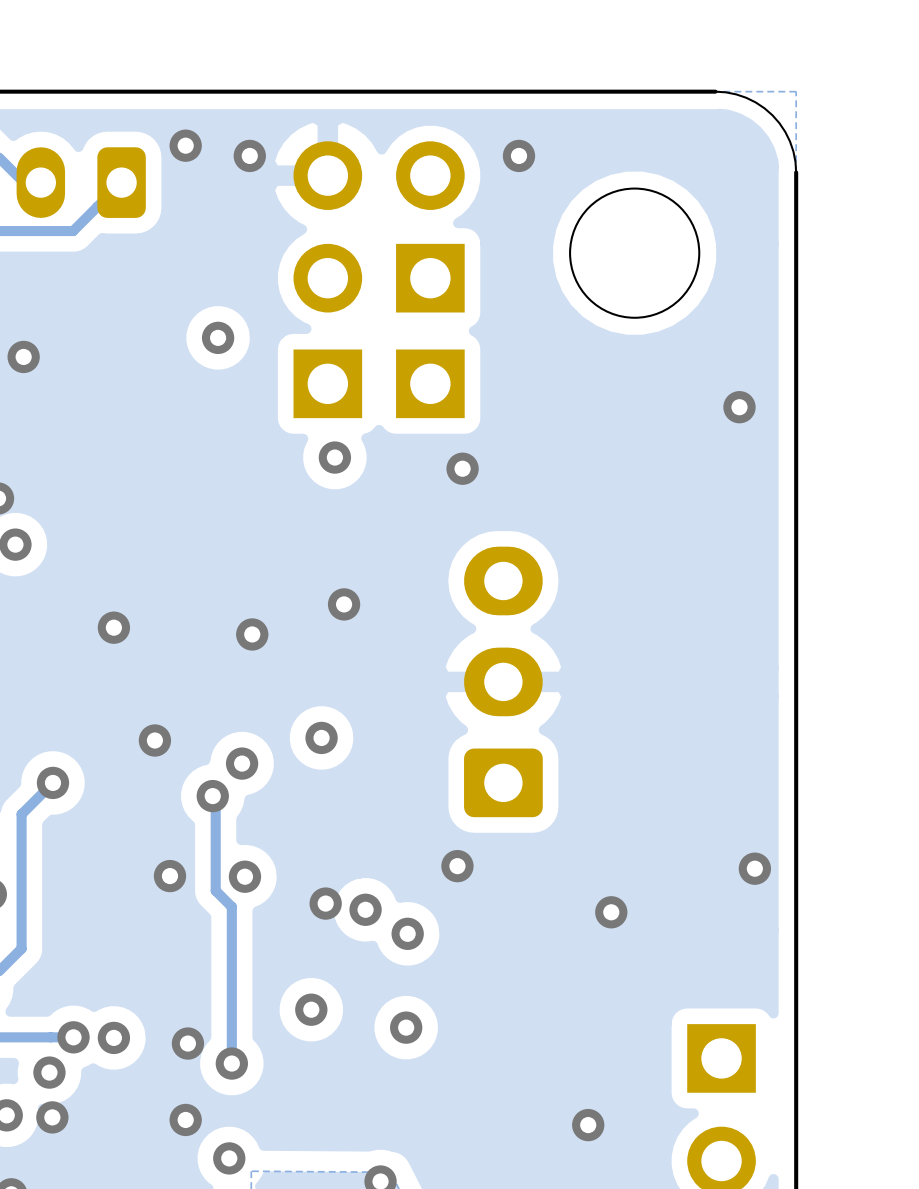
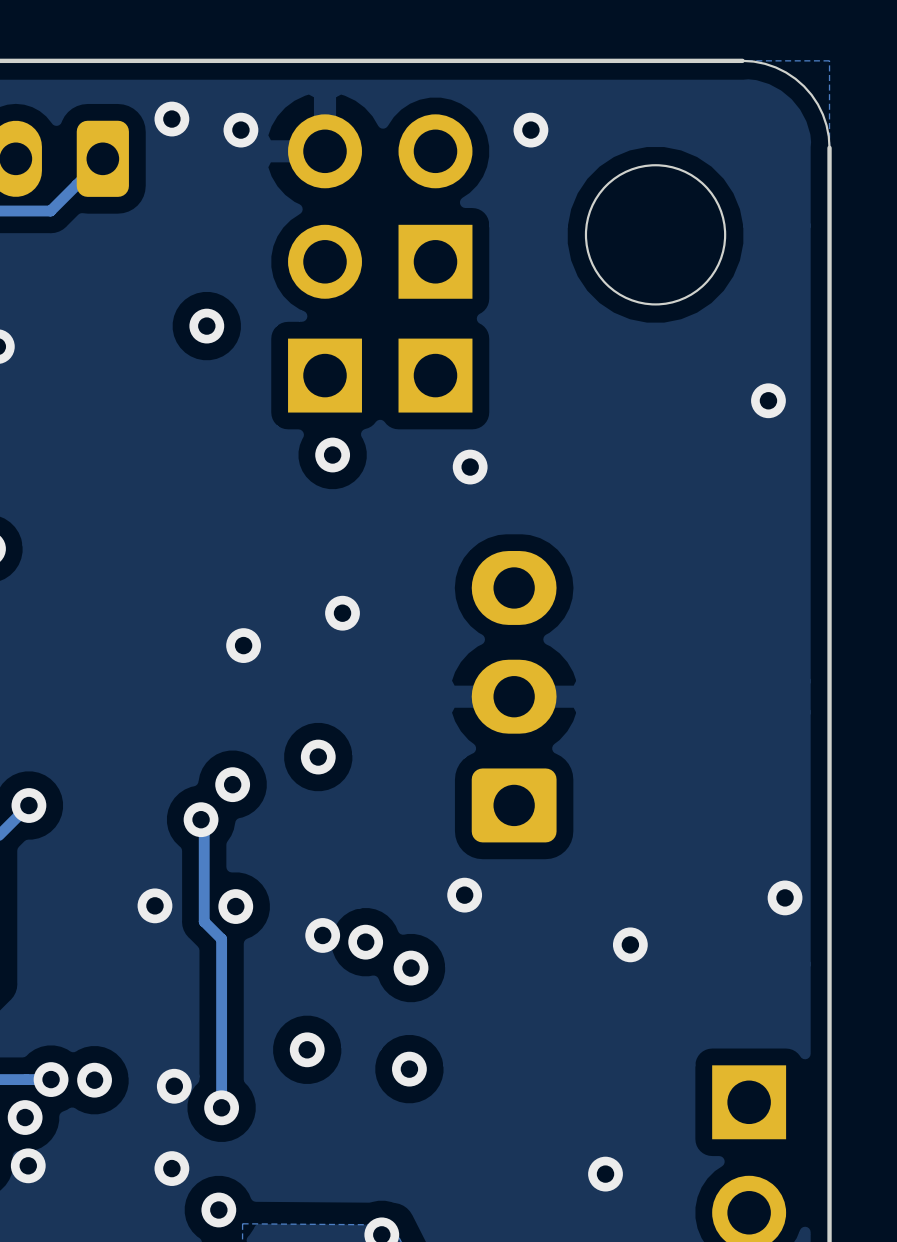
via: (113, 627) -> none
via: (154, 740) -> none

